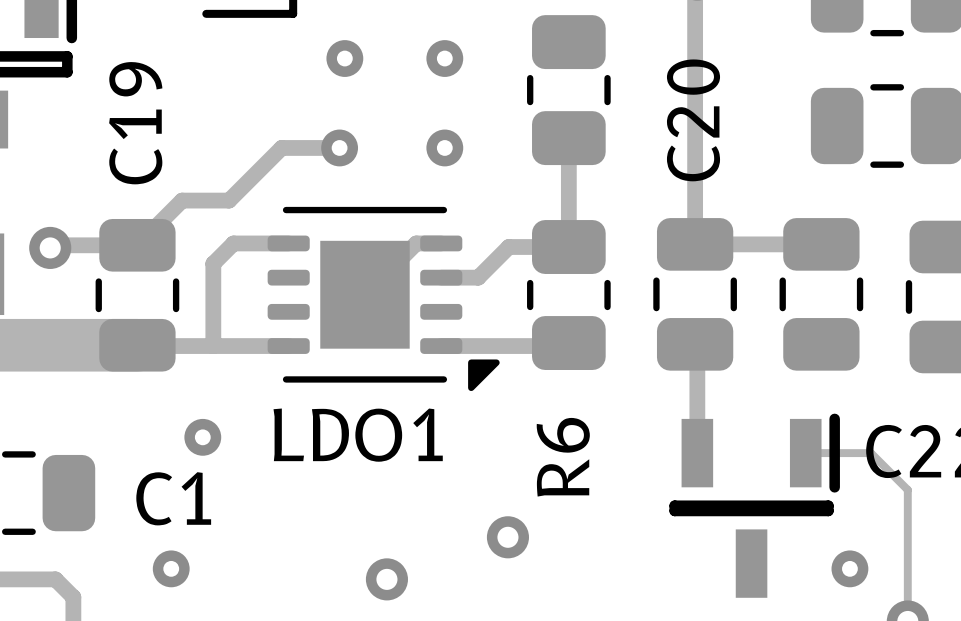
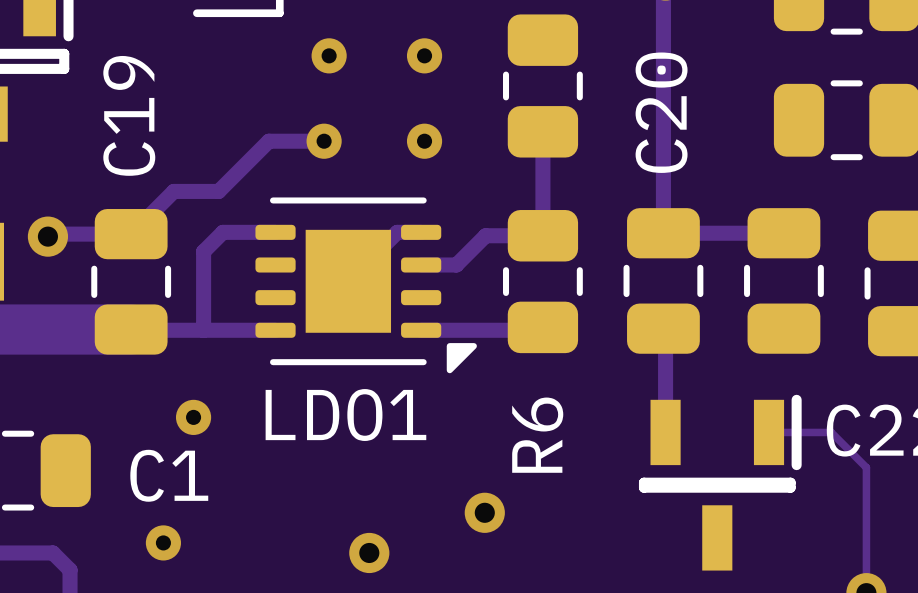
via: (849, 568) -> none

